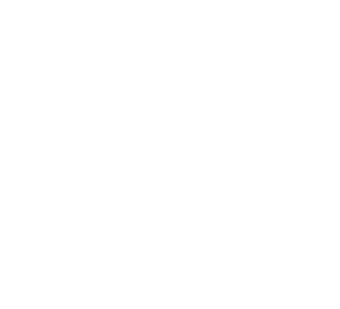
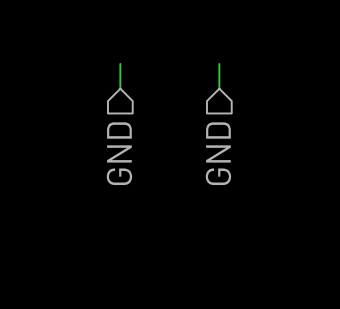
wire: none -> (120, 63) (120, 88)
wire: none -> (219, 63) (219, 88)
hierarchical label: none -> GND (119, 153)
hierarchical label: none -> GND (218, 153)

